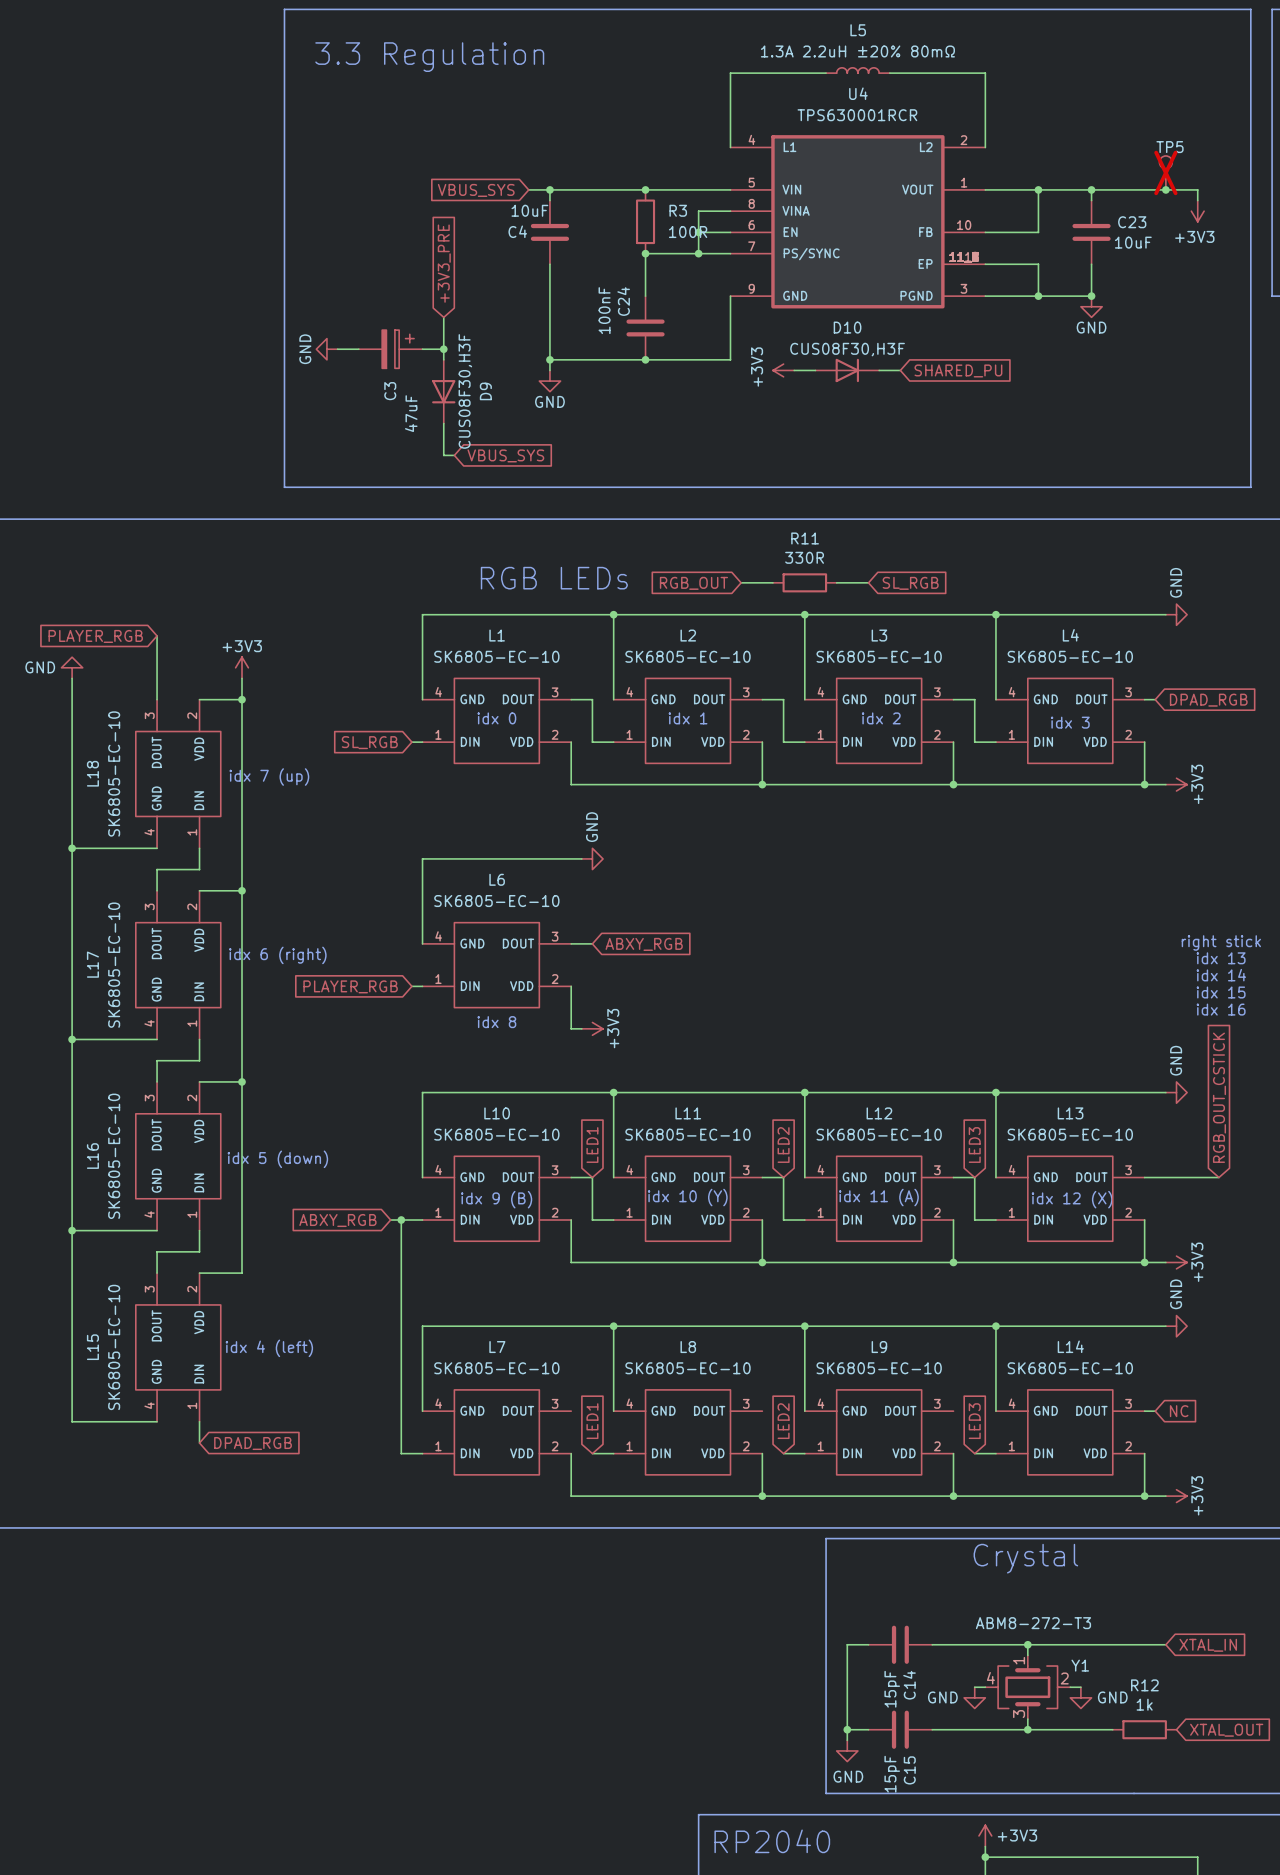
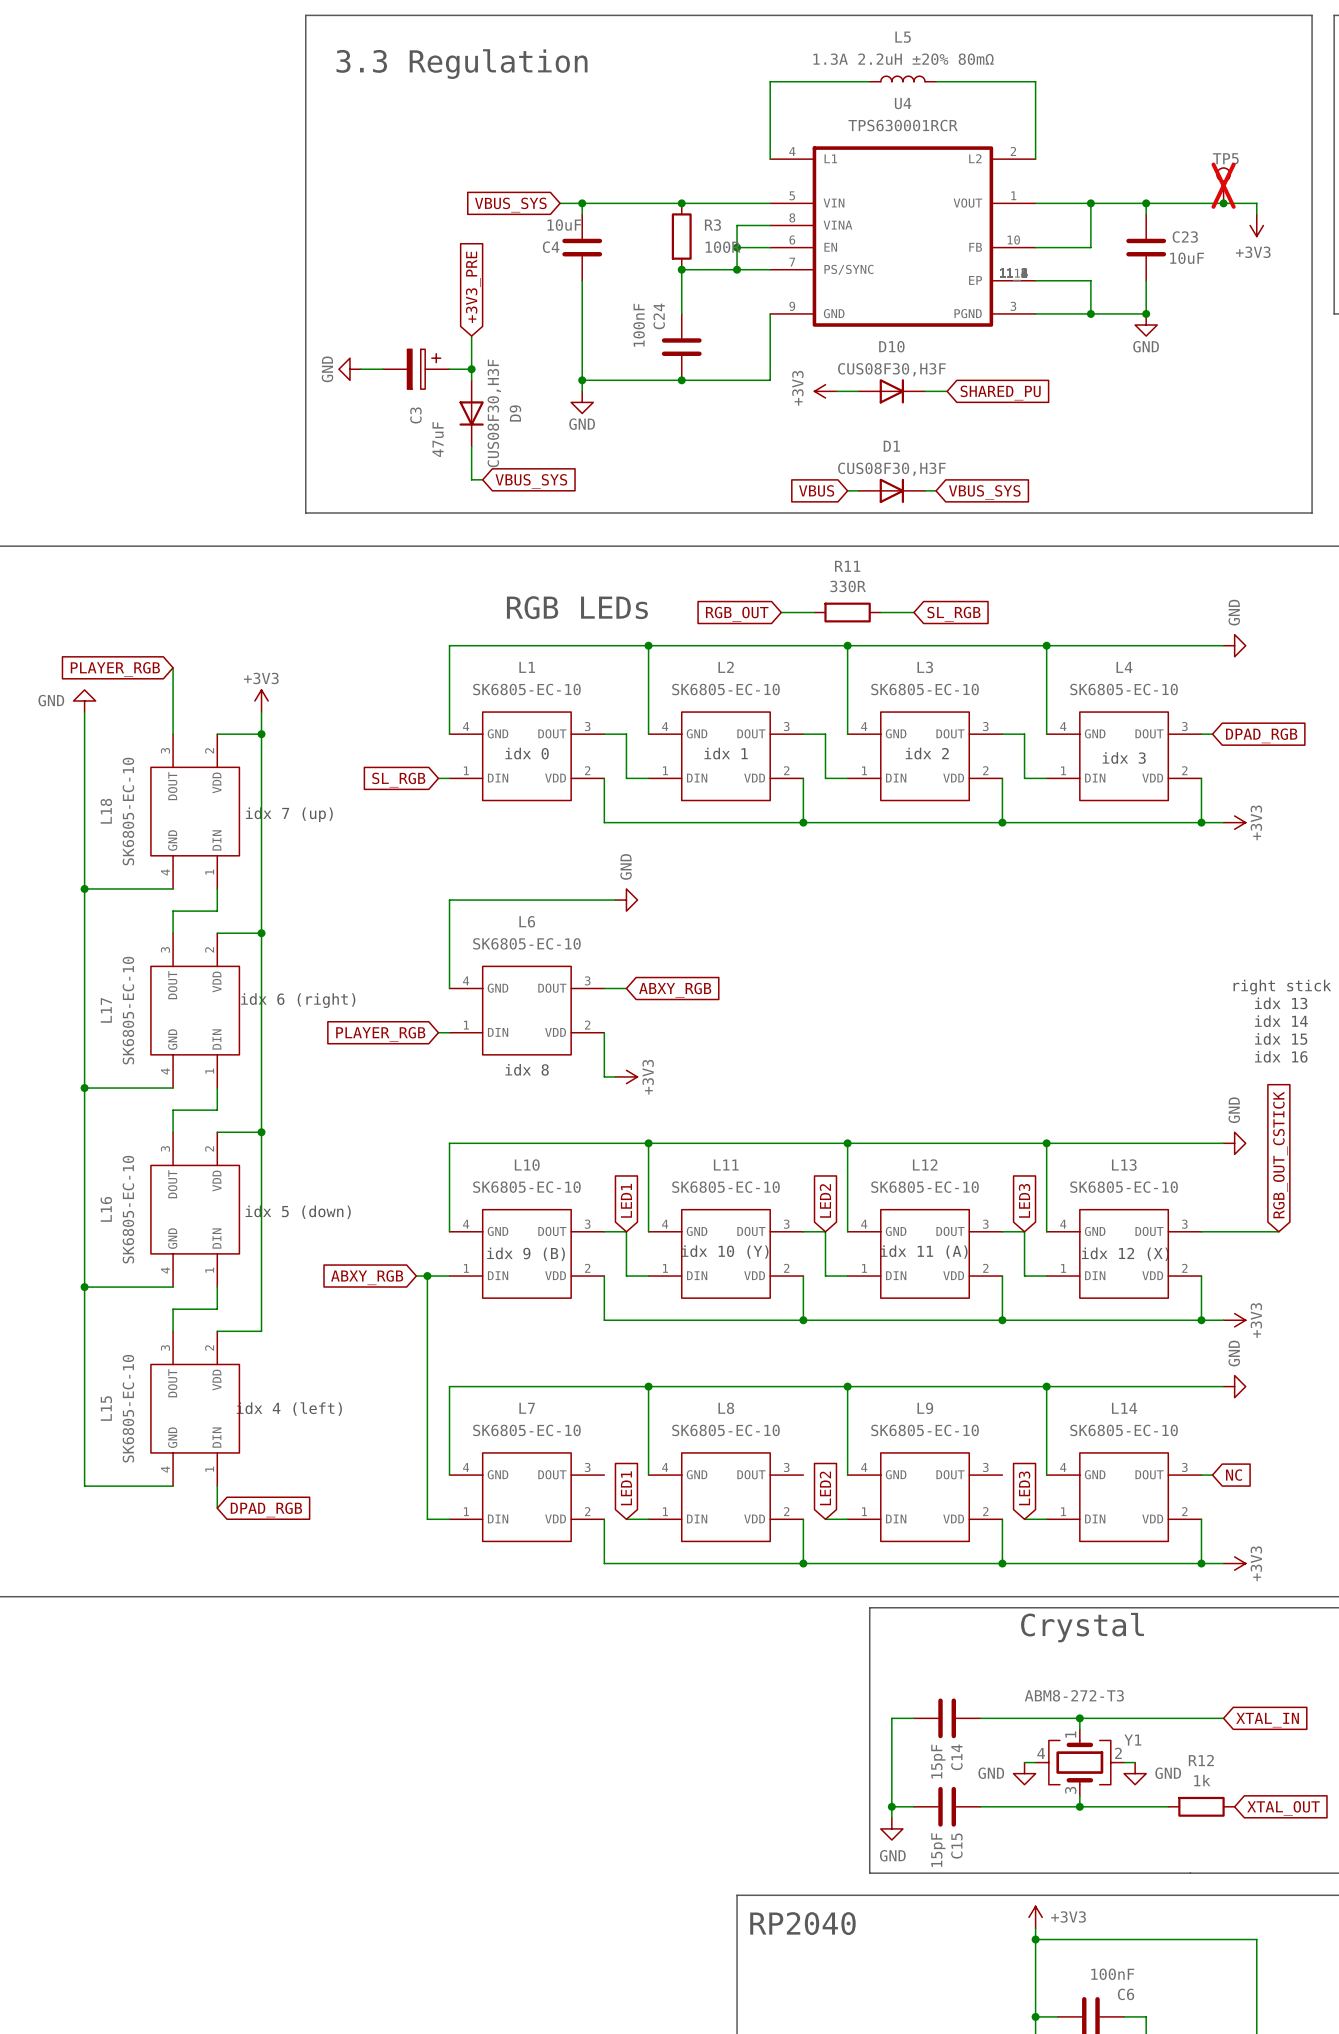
global label: none -> VBUS (816, 490)
wire: none -> (847, 490) (858, 490)
D1: none -> CUS08F30,H3F (891, 490)
wire: none -> (925, 490) (936, 490)
global label: none -> VBUS_SYS (984, 492)

